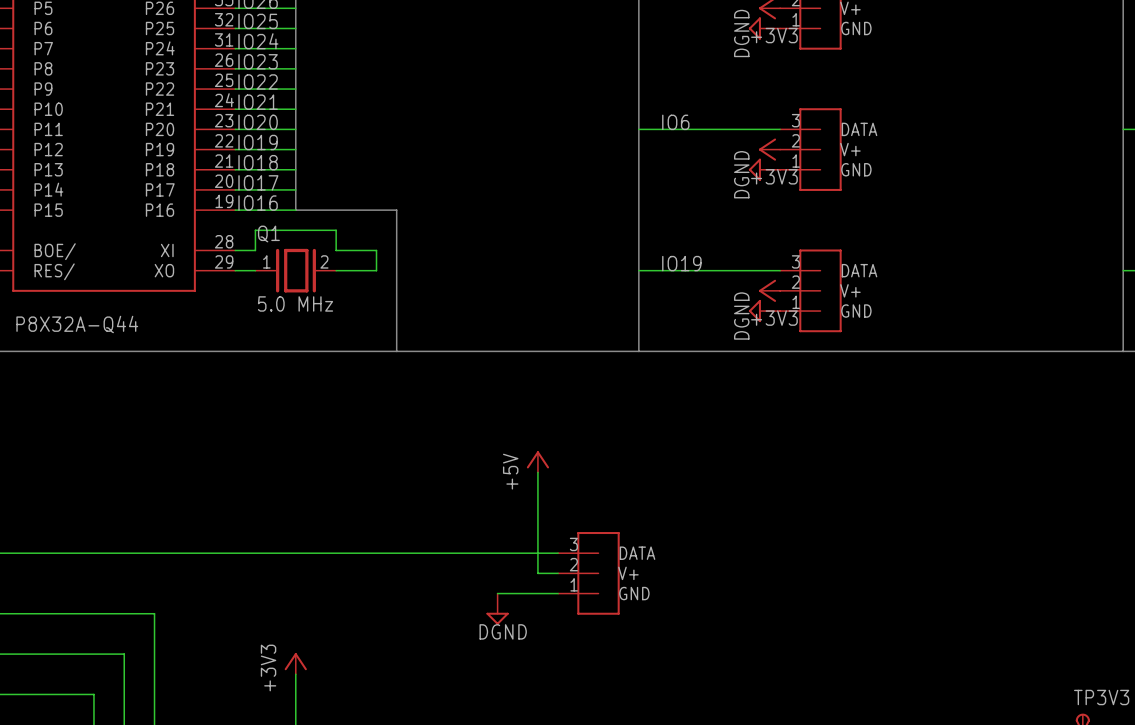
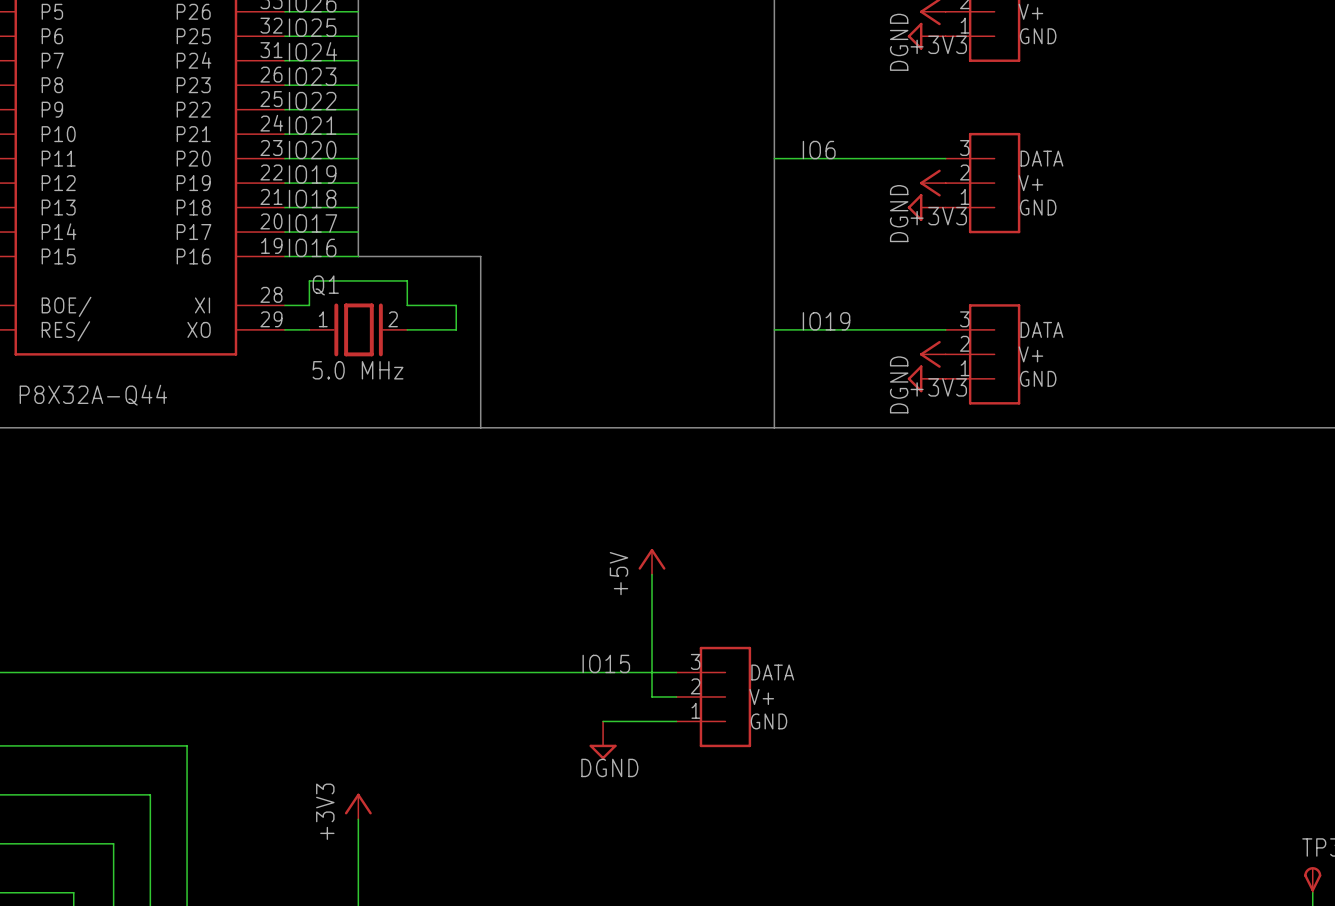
label: none -> IO15 (606, 663)

